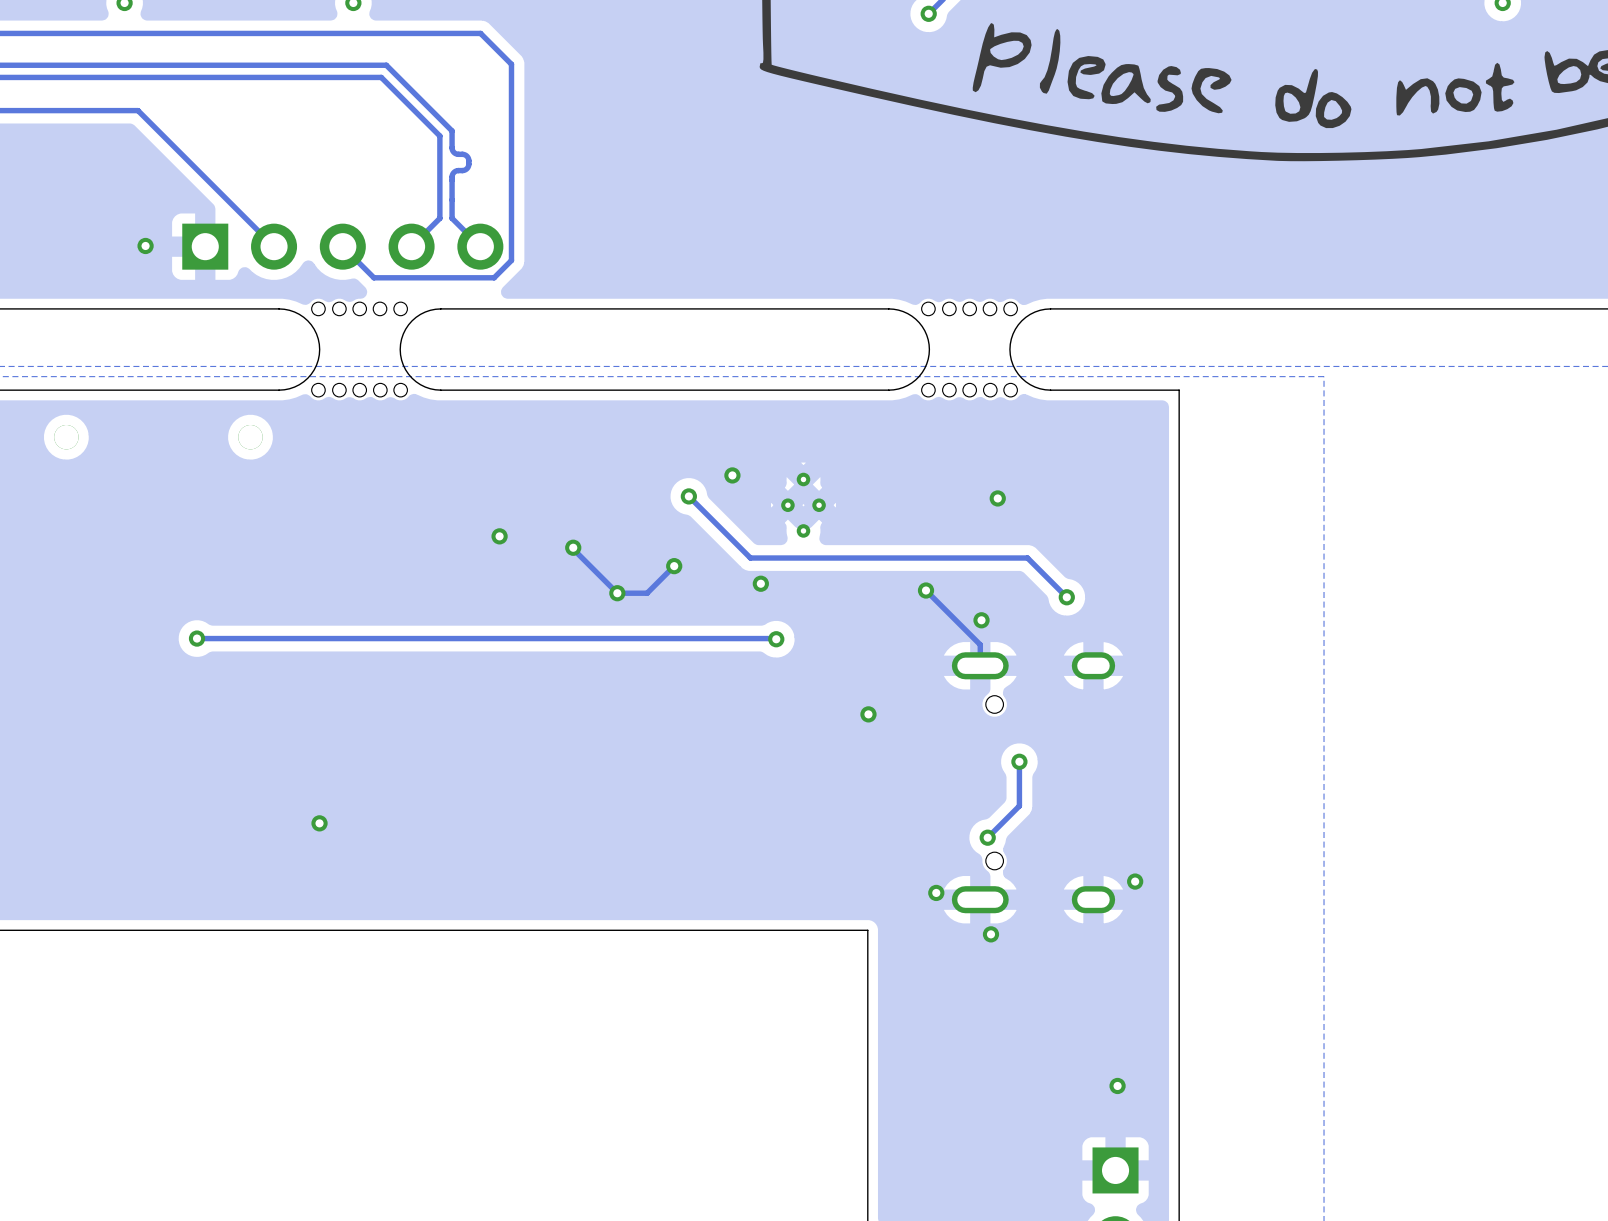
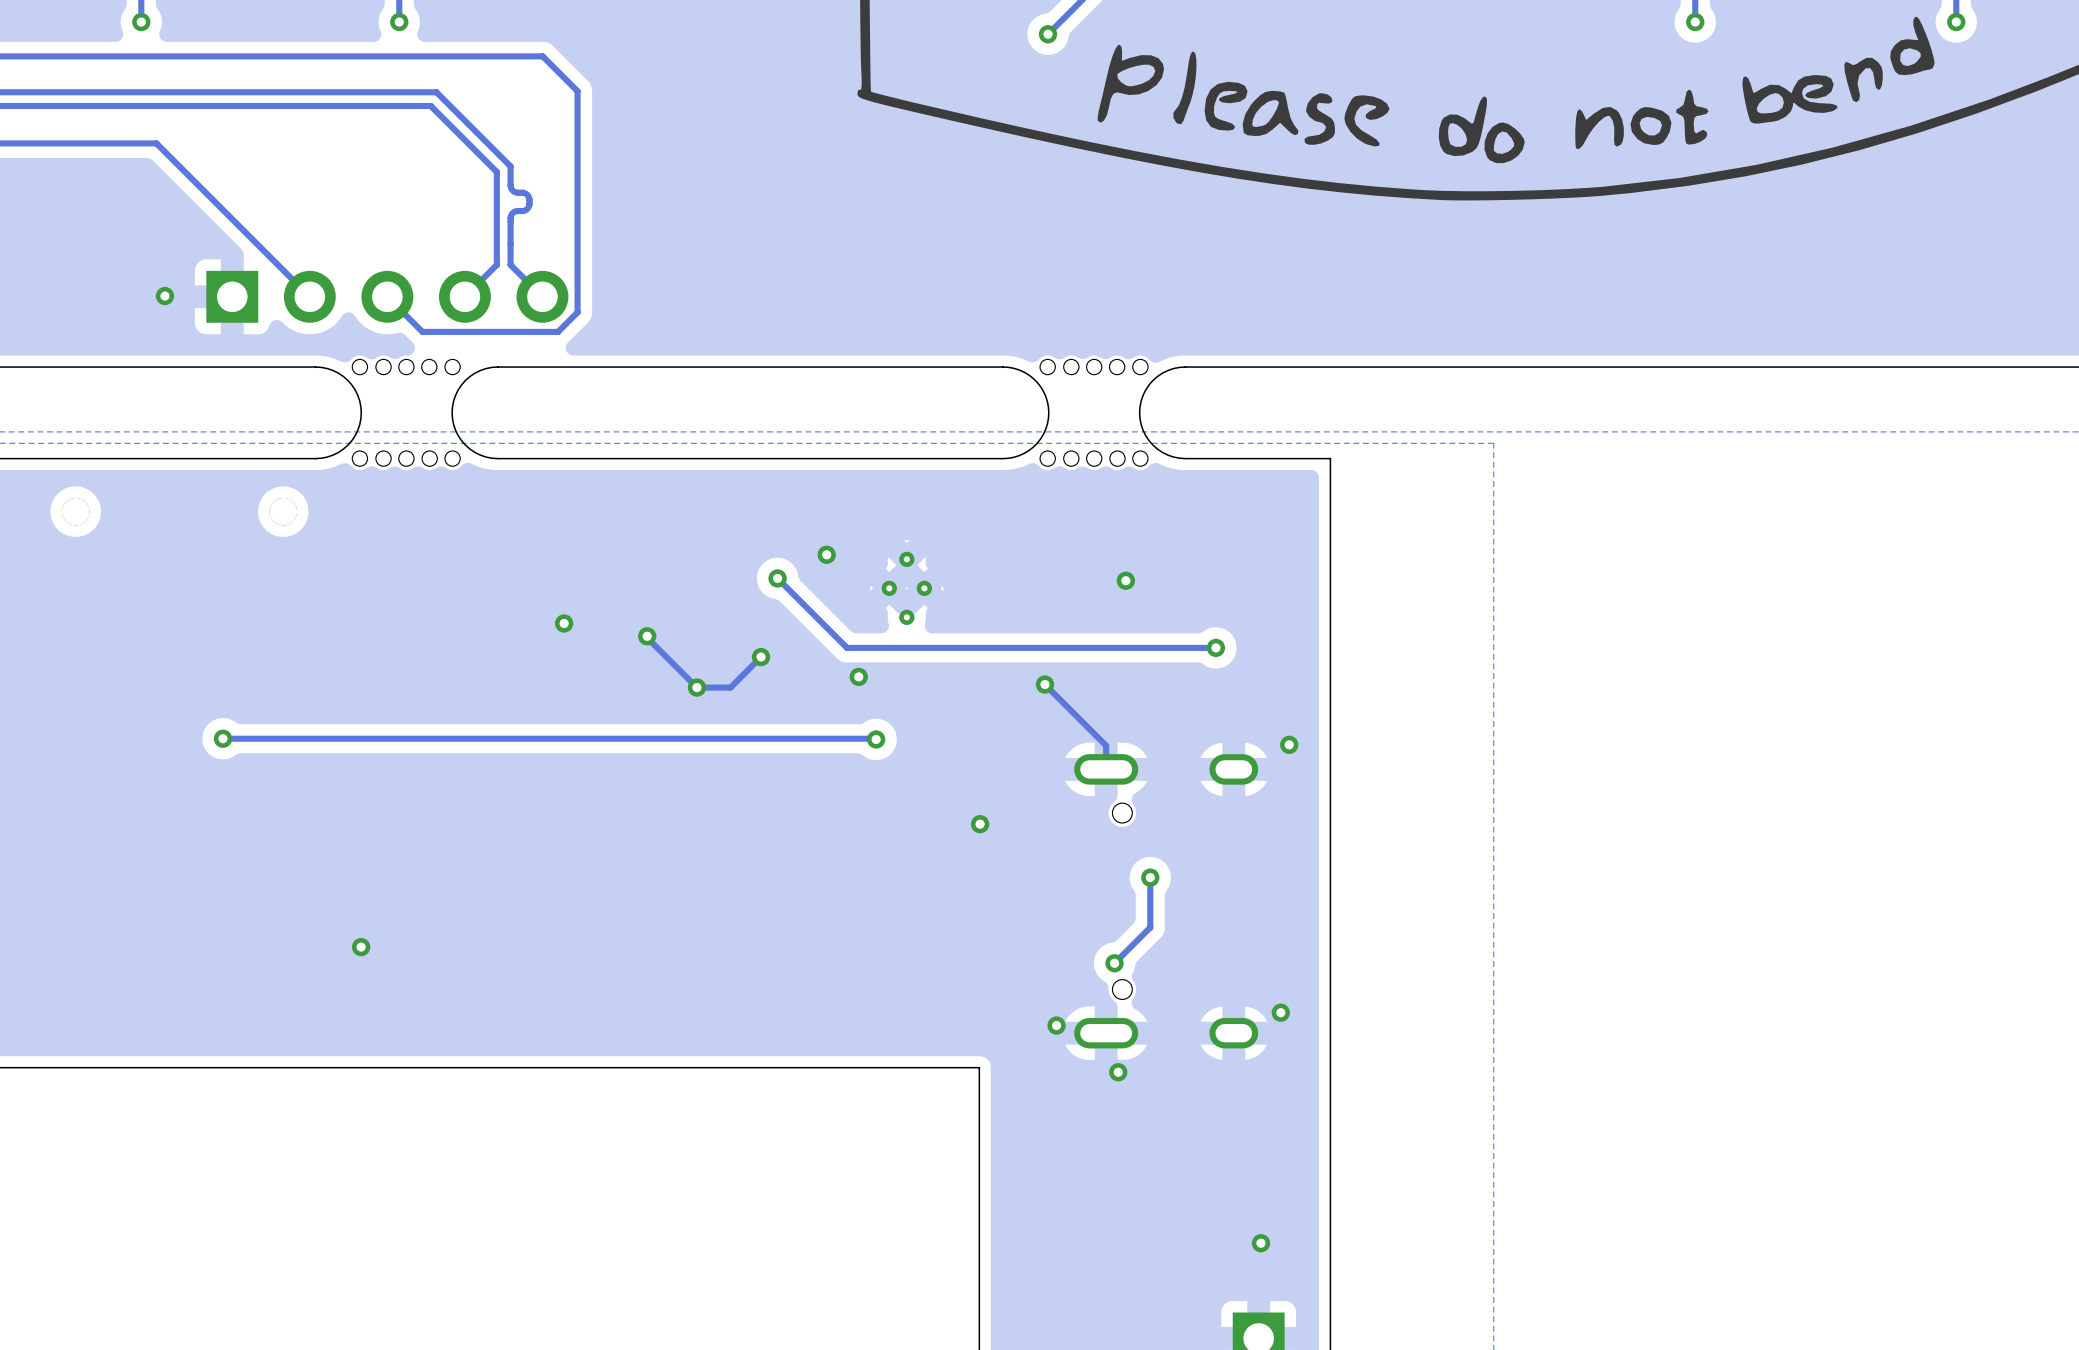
track: (1027, 558) (1066, 597) -> (1159, 647) (1215, 647)
via position: (1066, 597) -> (1215, 647)
via: (981, 620) -> none
via: none -> (1289, 744)

